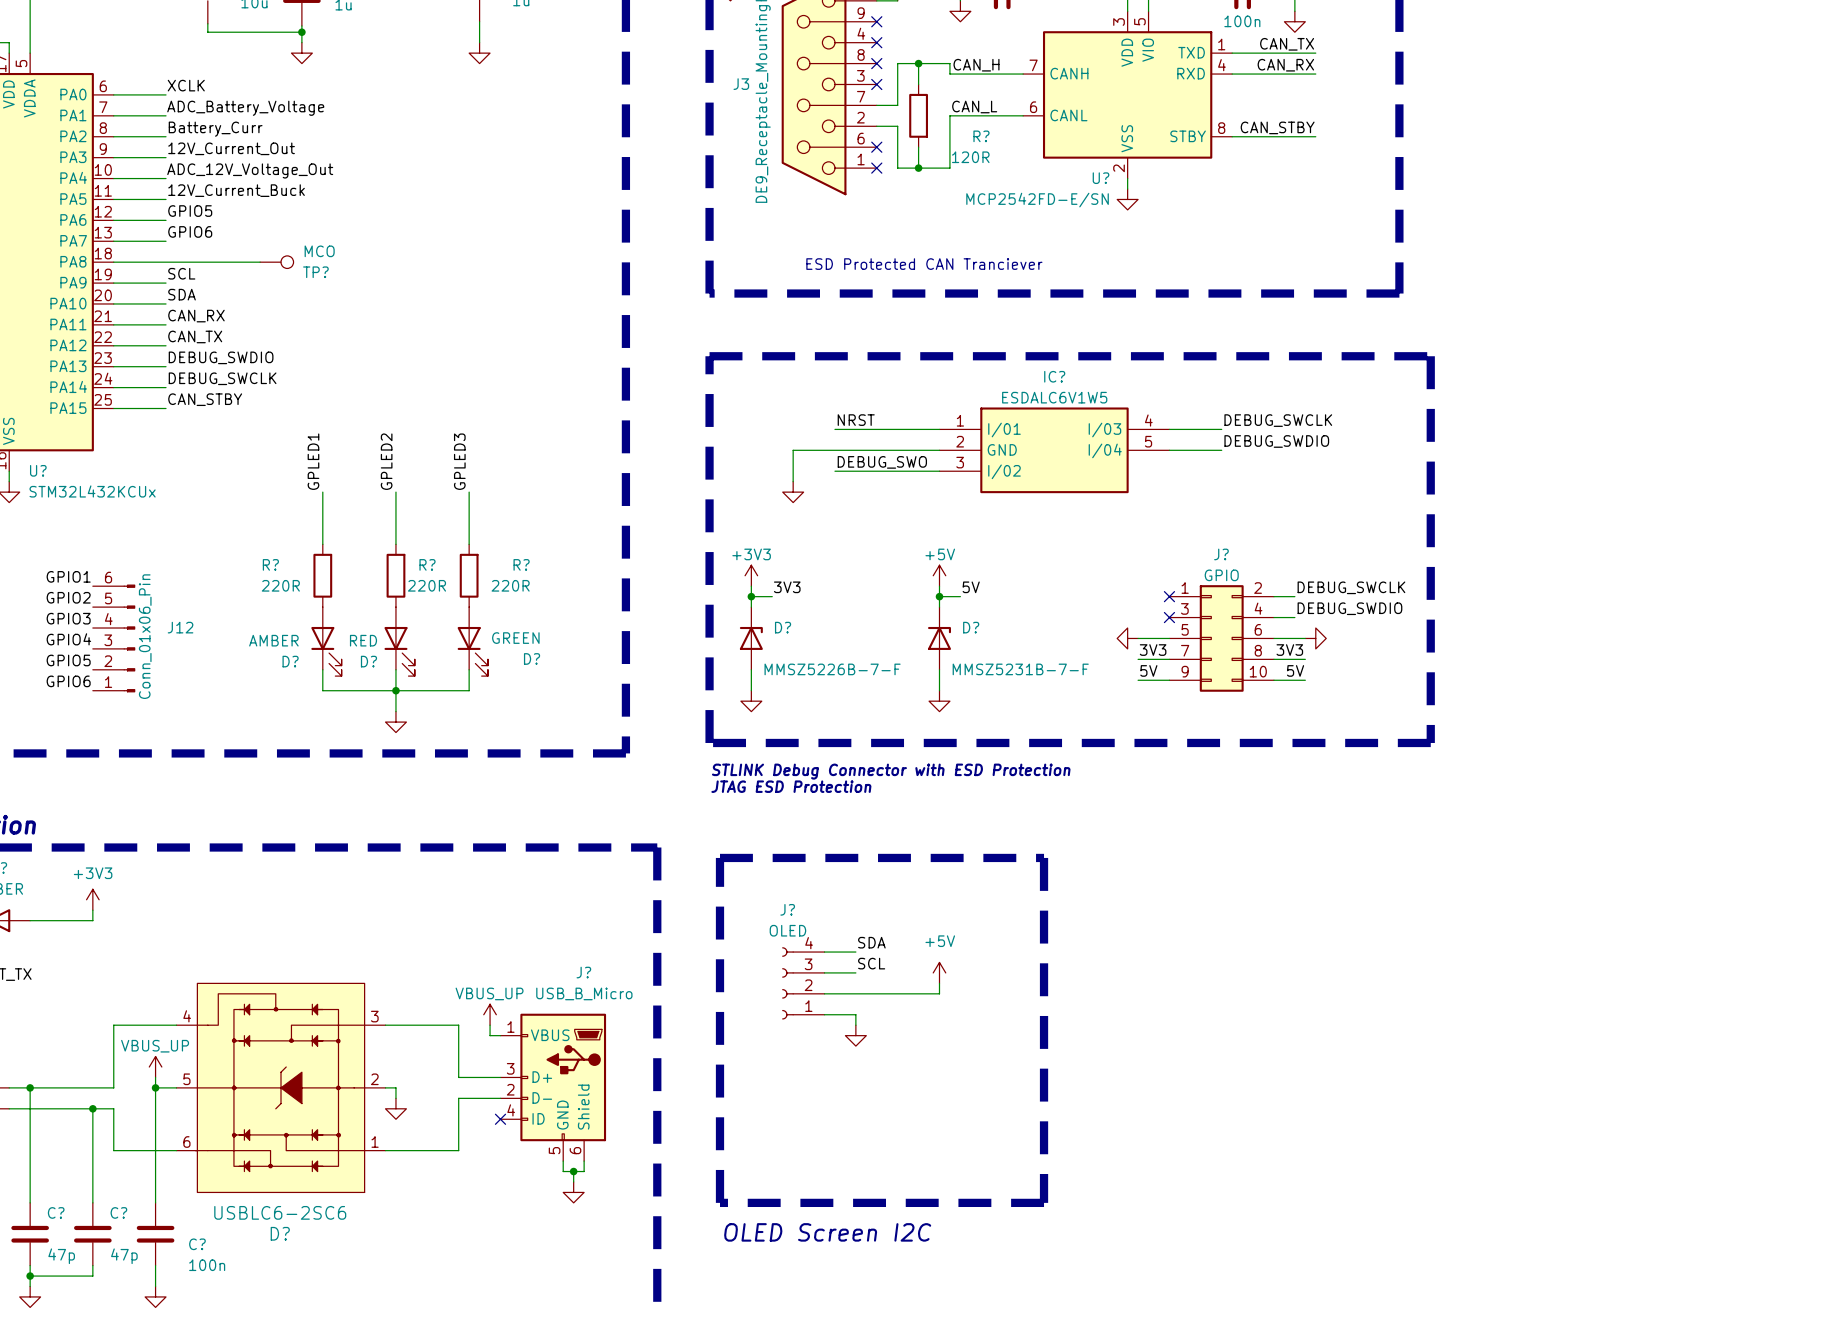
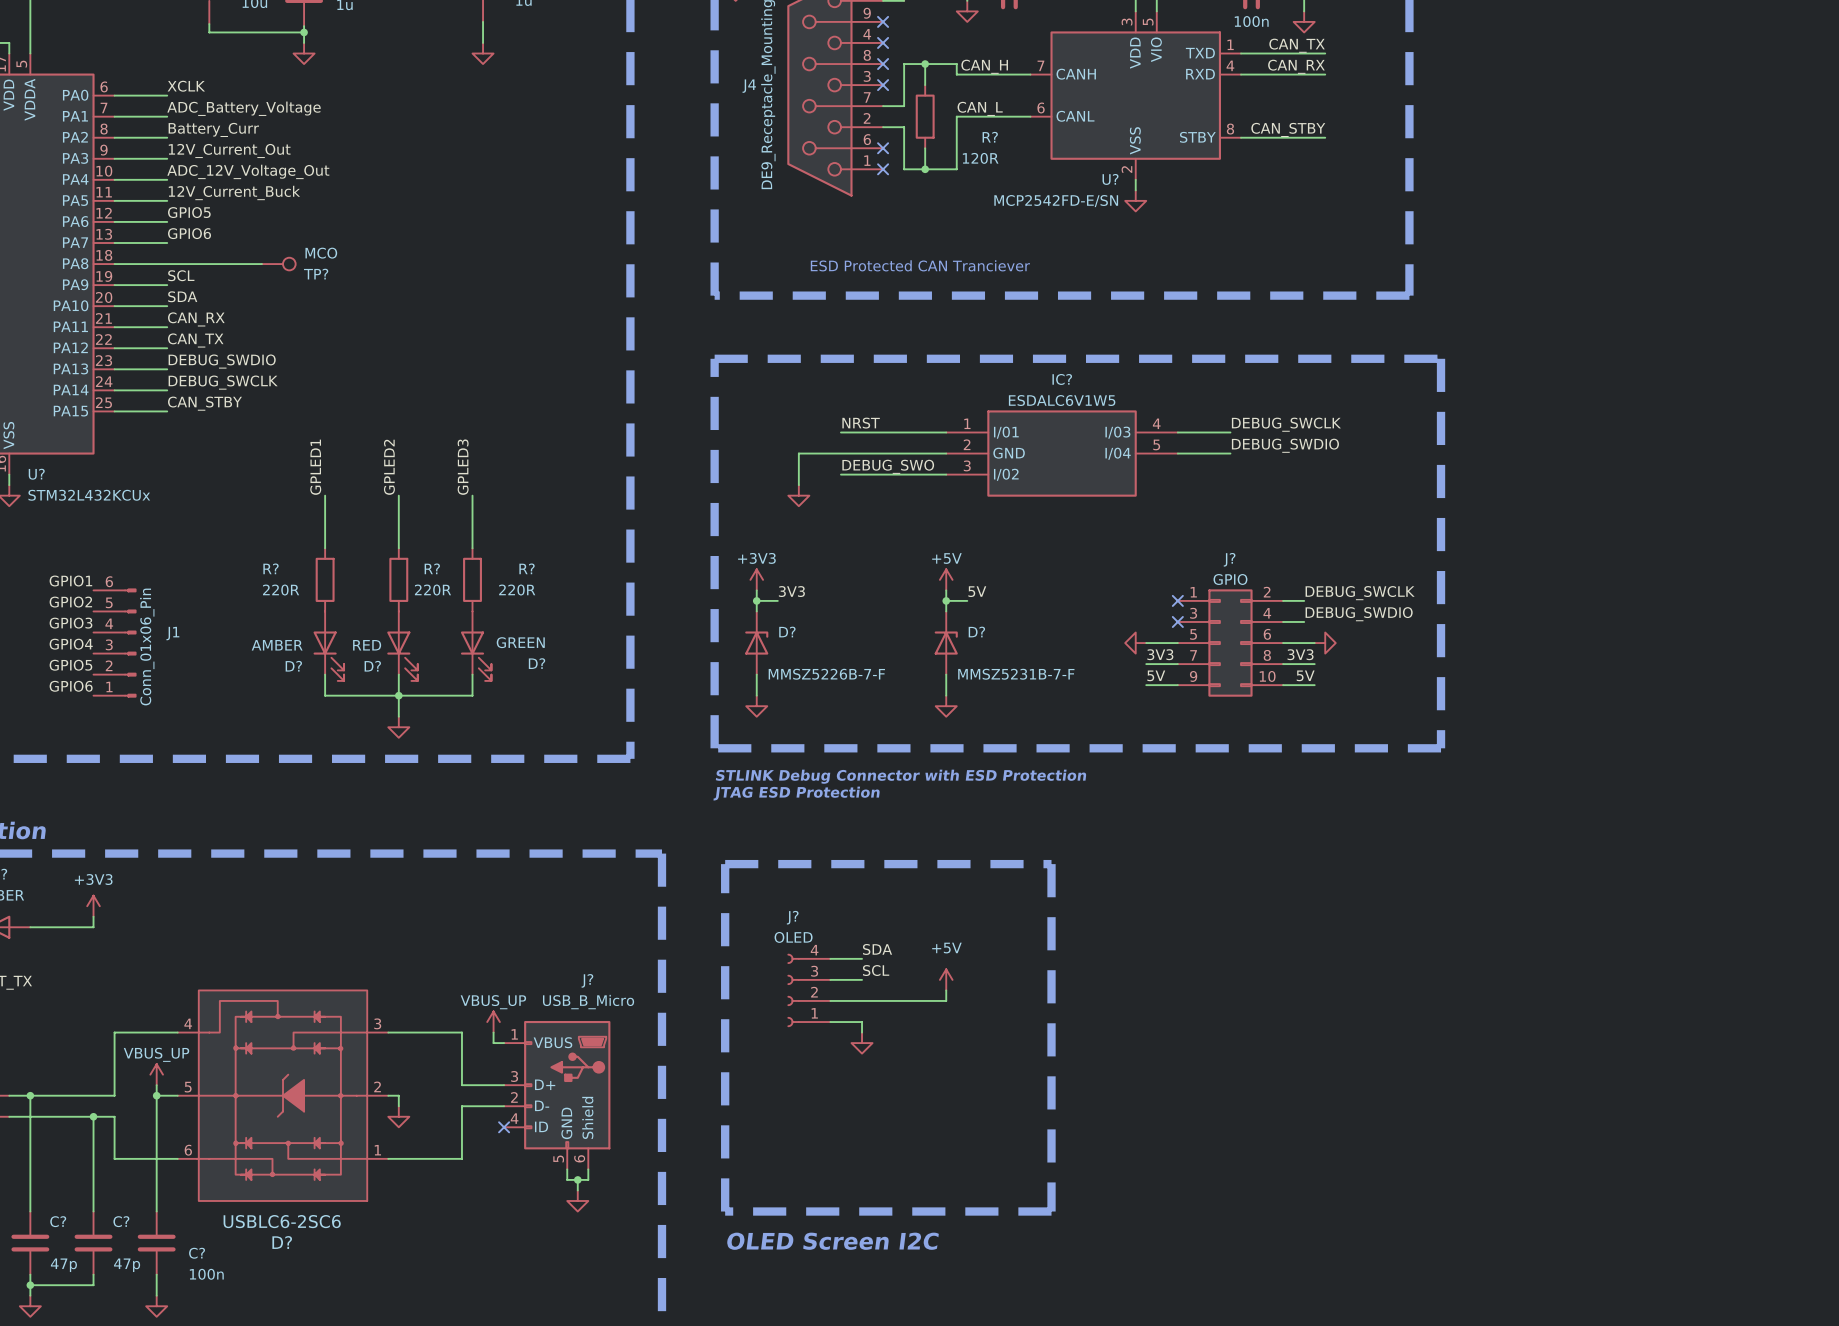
J3 name: J3 (741, 84) -> J4 (749, 86)
J12 name: J12 (180, 627) -> J1 (172, 633)

